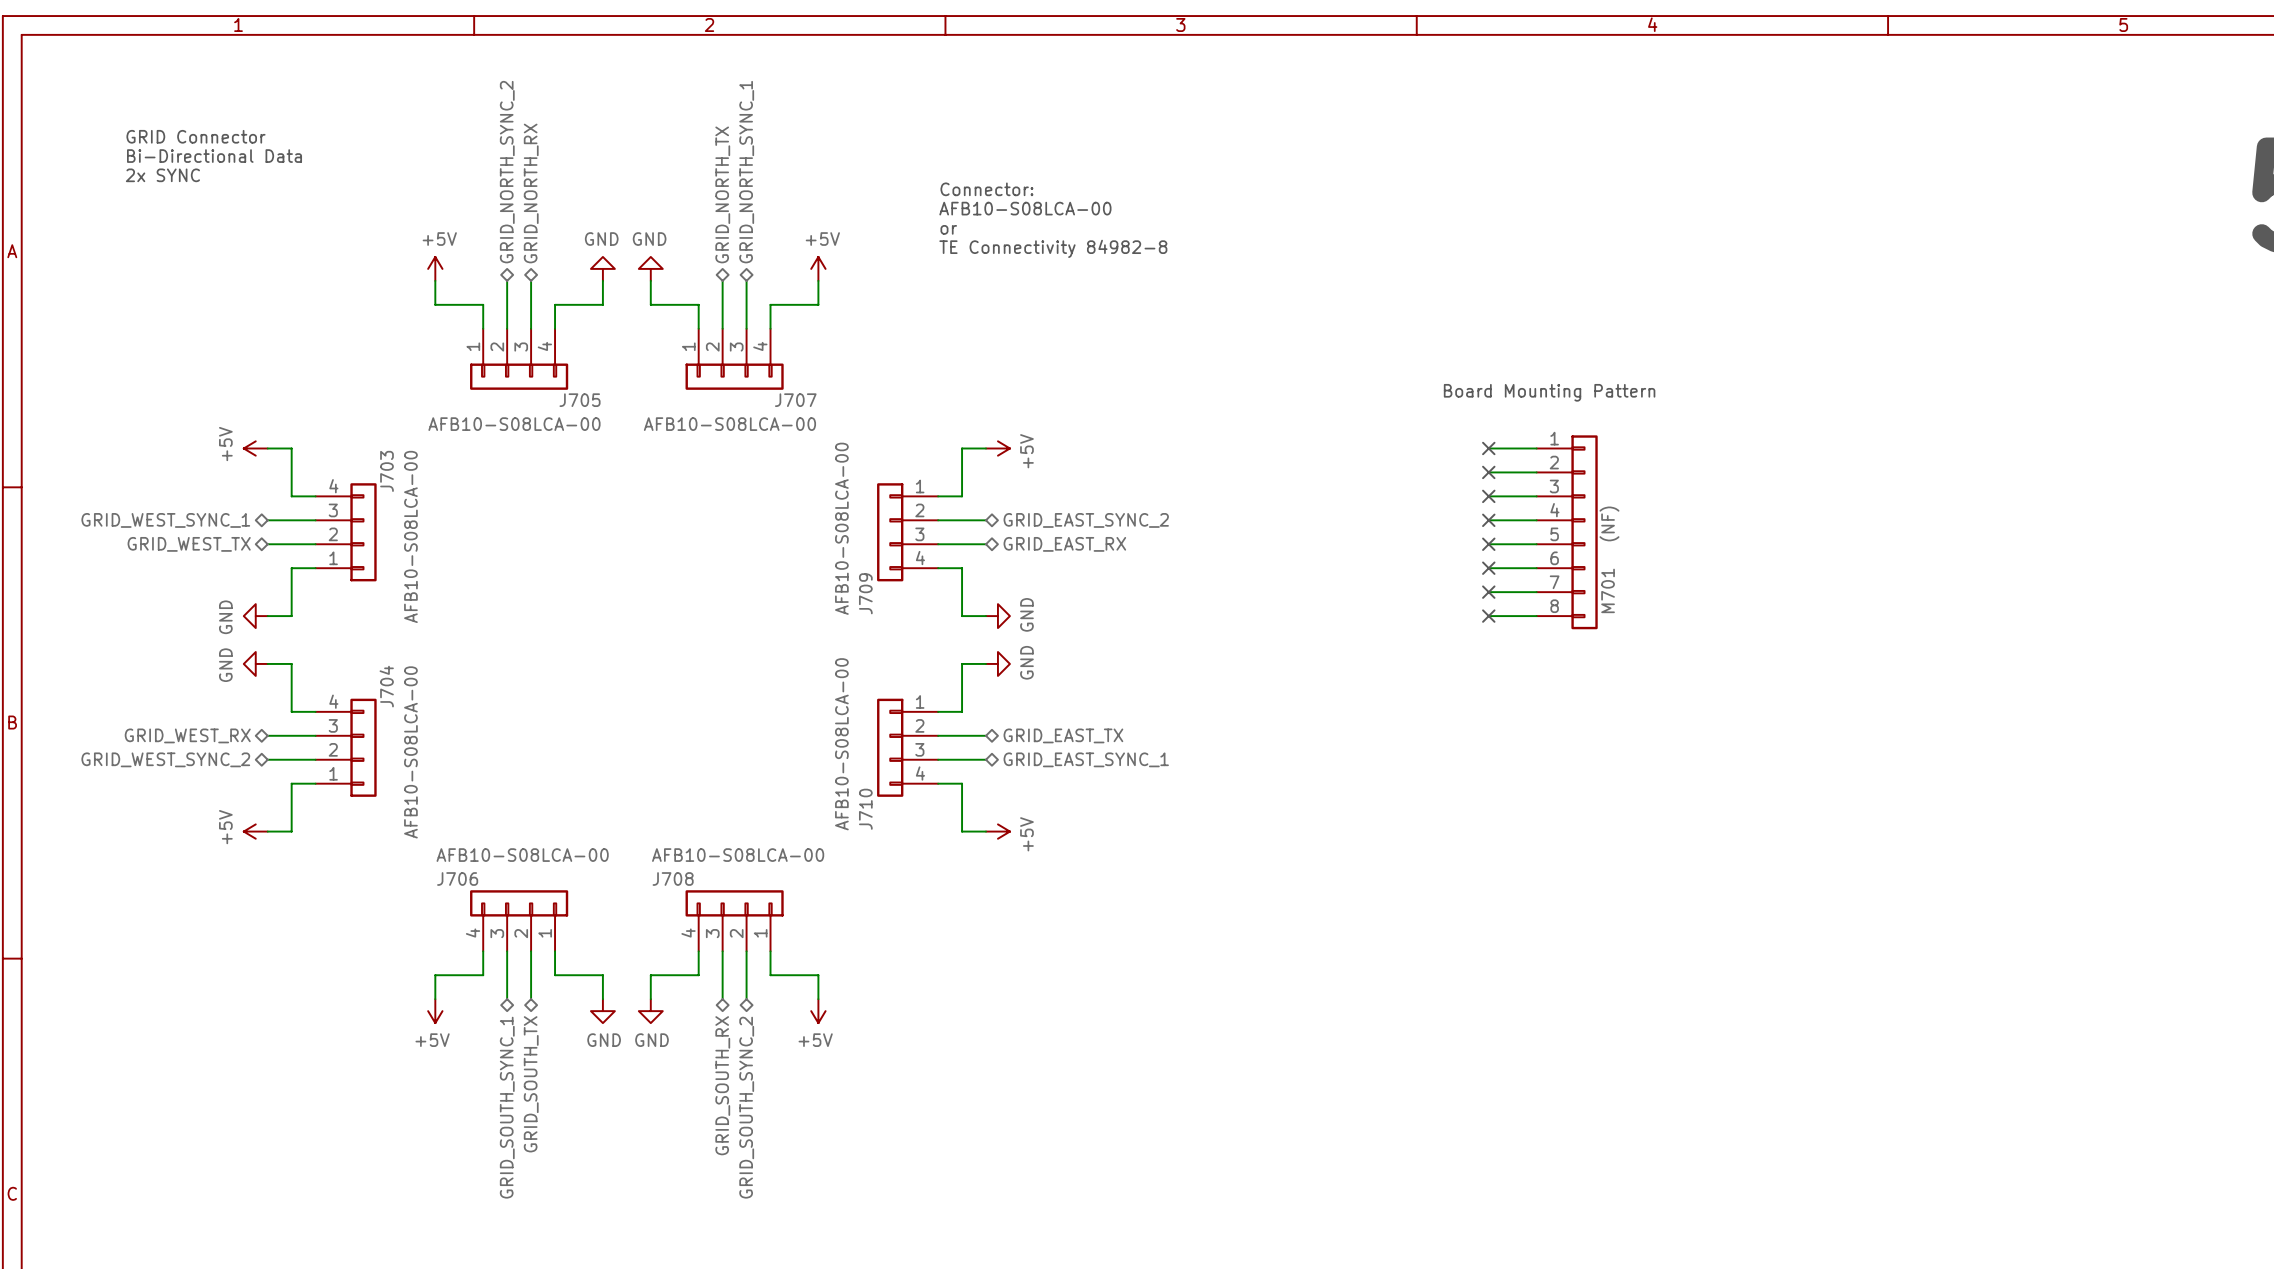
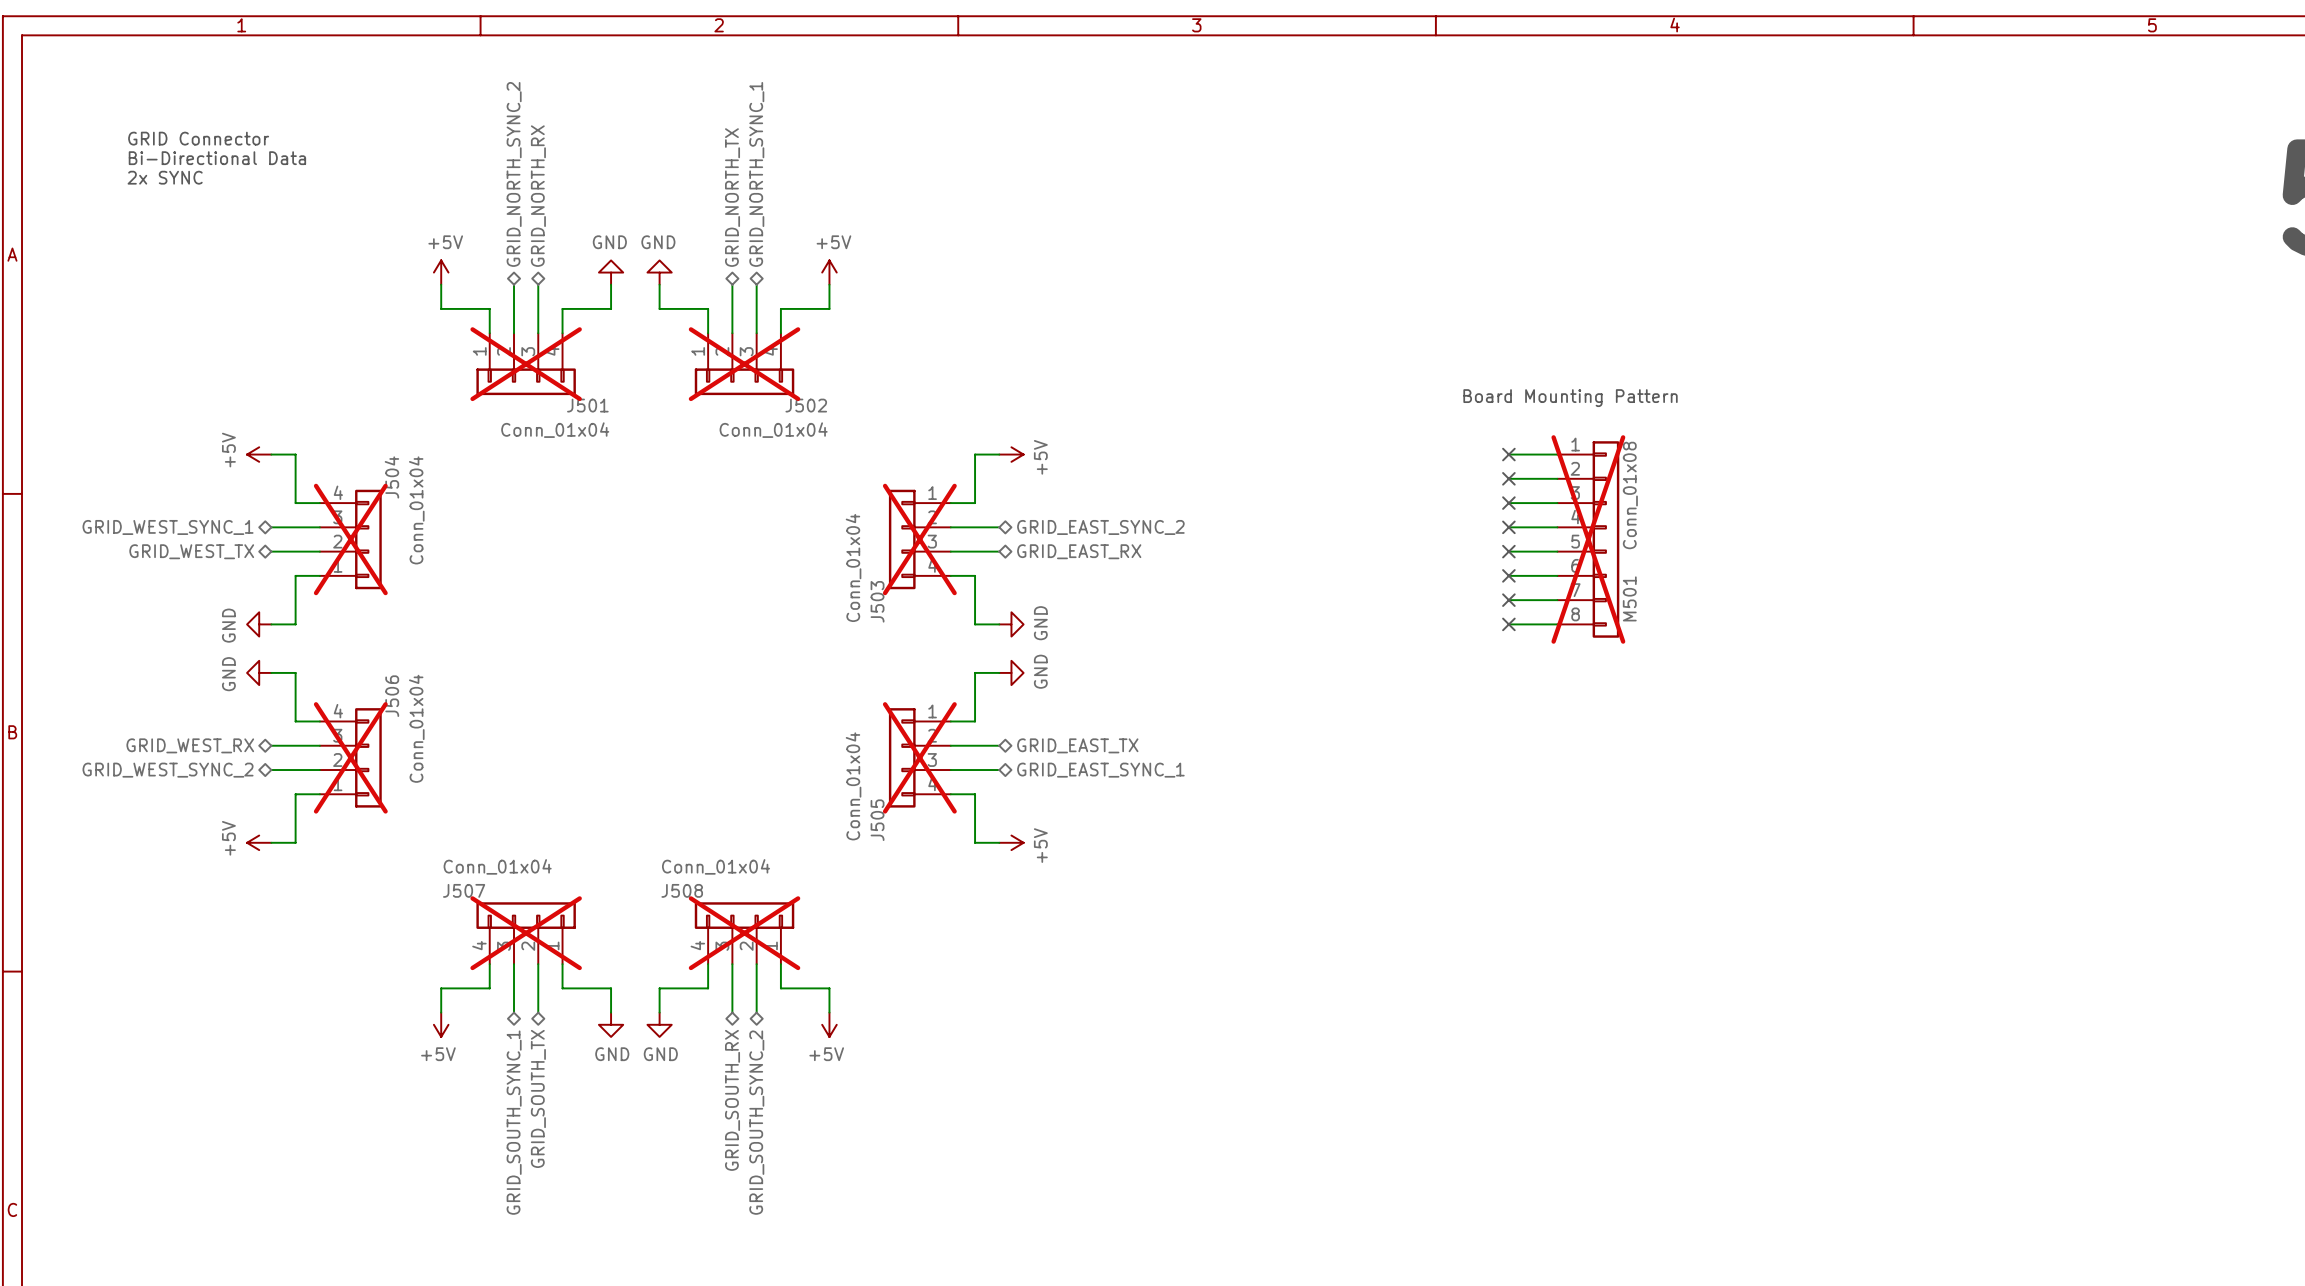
text: Connector: (986, 189) -> none
text: AFB10-S08LCA-00 (1025, 208) -> none
text: or (948, 229) -> none
text: TE Connectivity 84982-8 (1053, 248) -> none
J705 do-not-place cross: none -> (526, 364)
J707 do-not-place cross: none -> (744, 364)
J705 name: J705 (580, 400) -> J501 (587, 405)
J707 name: J707 (795, 400) -> J502 (806, 405)
J705 value: AFB10-S08LCA-00 (514, 424) -> Conn_01x04 (555, 430)
J707 value: AFB10-S08LCA-00 (729, 424) -> Conn_01x04 (773, 430)
J703 name: J703 (386, 471) -> J504 (391, 477)
M701 value: (NF) (1609, 523) -> Conn_01x08 (1630, 495)
J709 value: AFB10-S08LCA-00 (841, 528) -> Conn_01x04 (853, 567)
J703 do-not-place cross: none -> (350, 539)
J709 do-not-place cross: none -> (919, 539)
M701 do-not-place cross: none -> (1588, 539)
J703 value: AFB10-S08LCA-00 (410, 536) -> Conn_01x04 (416, 510)
M701 name: M701 (1608, 590) -> M501 (1629, 598)
J709 name: J709 (865, 593) -> J503 (877, 601)
J704 name: J704 (386, 686) -> J506 (392, 696)
J710 value: AFB10-S08LCA-00 (841, 744) -> Conn_01x04 (853, 786)
J704 do-not-place cross: none -> (350, 757)
J710 do-not-place cross: none -> (919, 757)
J704 value: AFB10-S08LCA-00 (410, 752) -> Conn_01x04 (416, 728)
J710 name: J710 (865, 809) -> J505 (877, 820)
J706 value: AFB10-S08LCA-00 (522, 855) -> Conn_01x04 (497, 866)
J708 value: AFB10-S08LCA-00 (738, 855) -> Conn_01x04 (716, 866)
J706 name: J706 (457, 879) -> J507 (464, 890)
J708 name: J708 (673, 879) -> J508 (682, 890)
J706 do-not-place cross: none -> (526, 933)
J708 do-not-place cross: none -> (744, 933)

